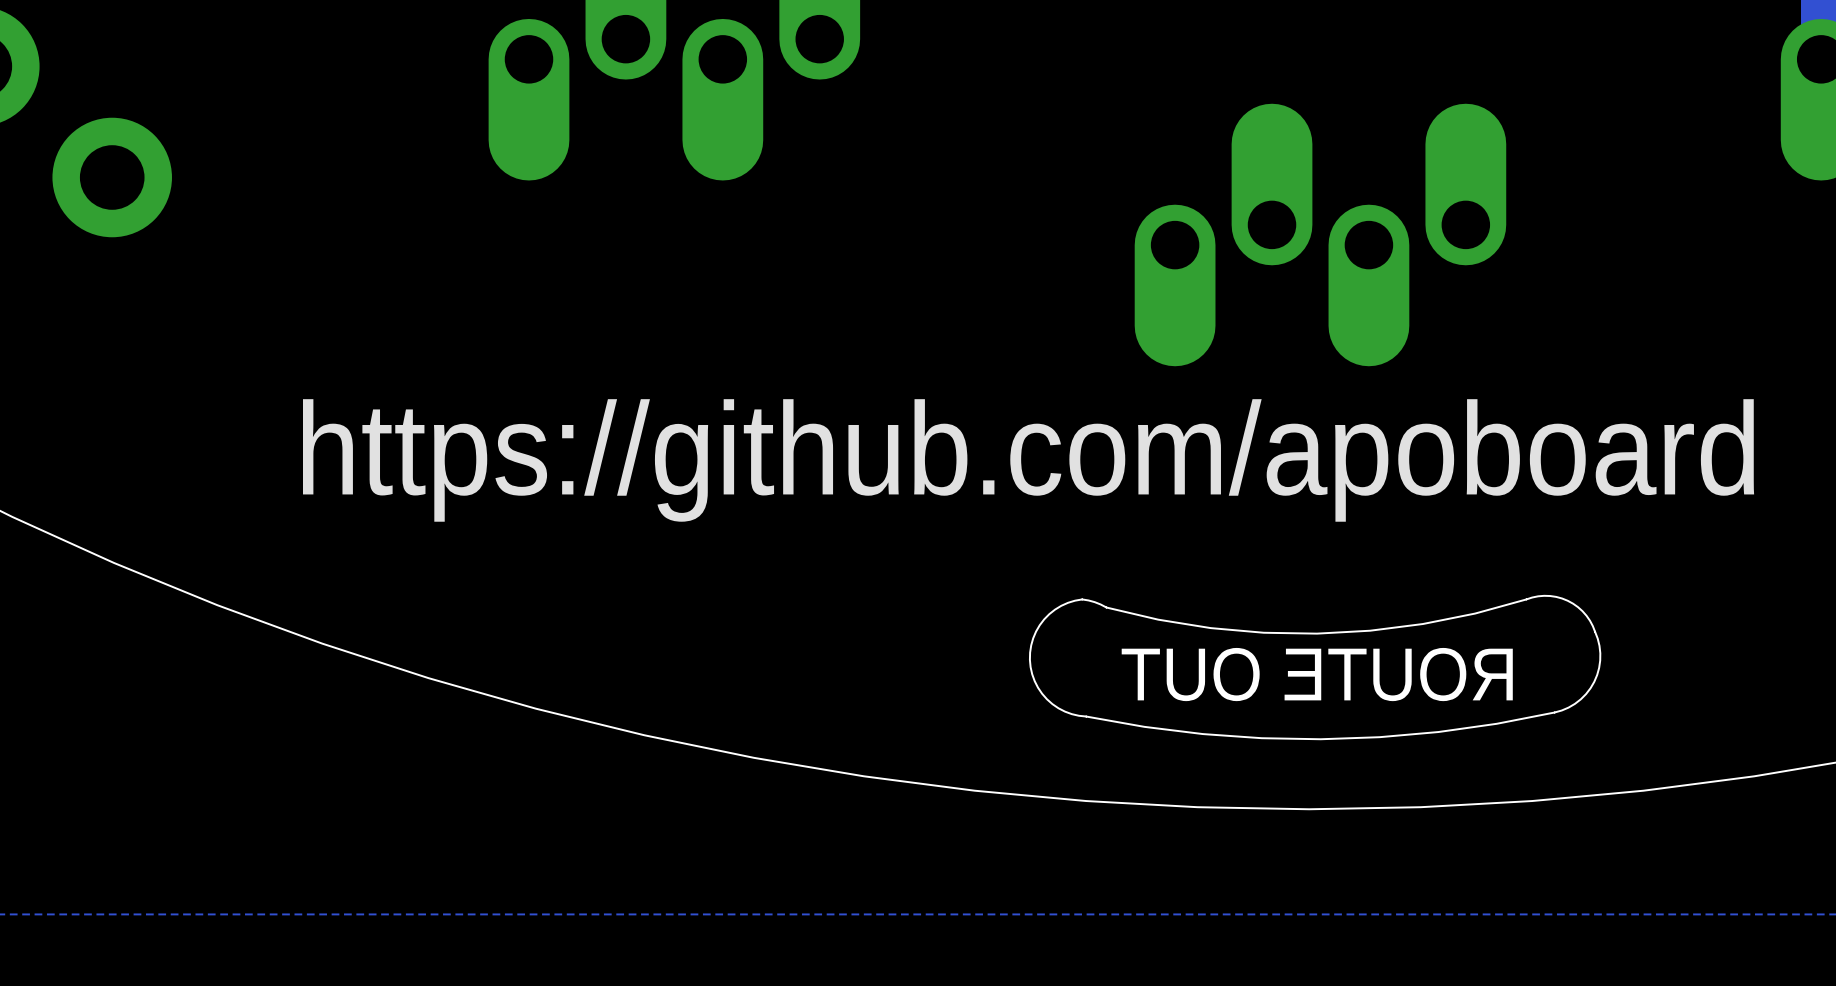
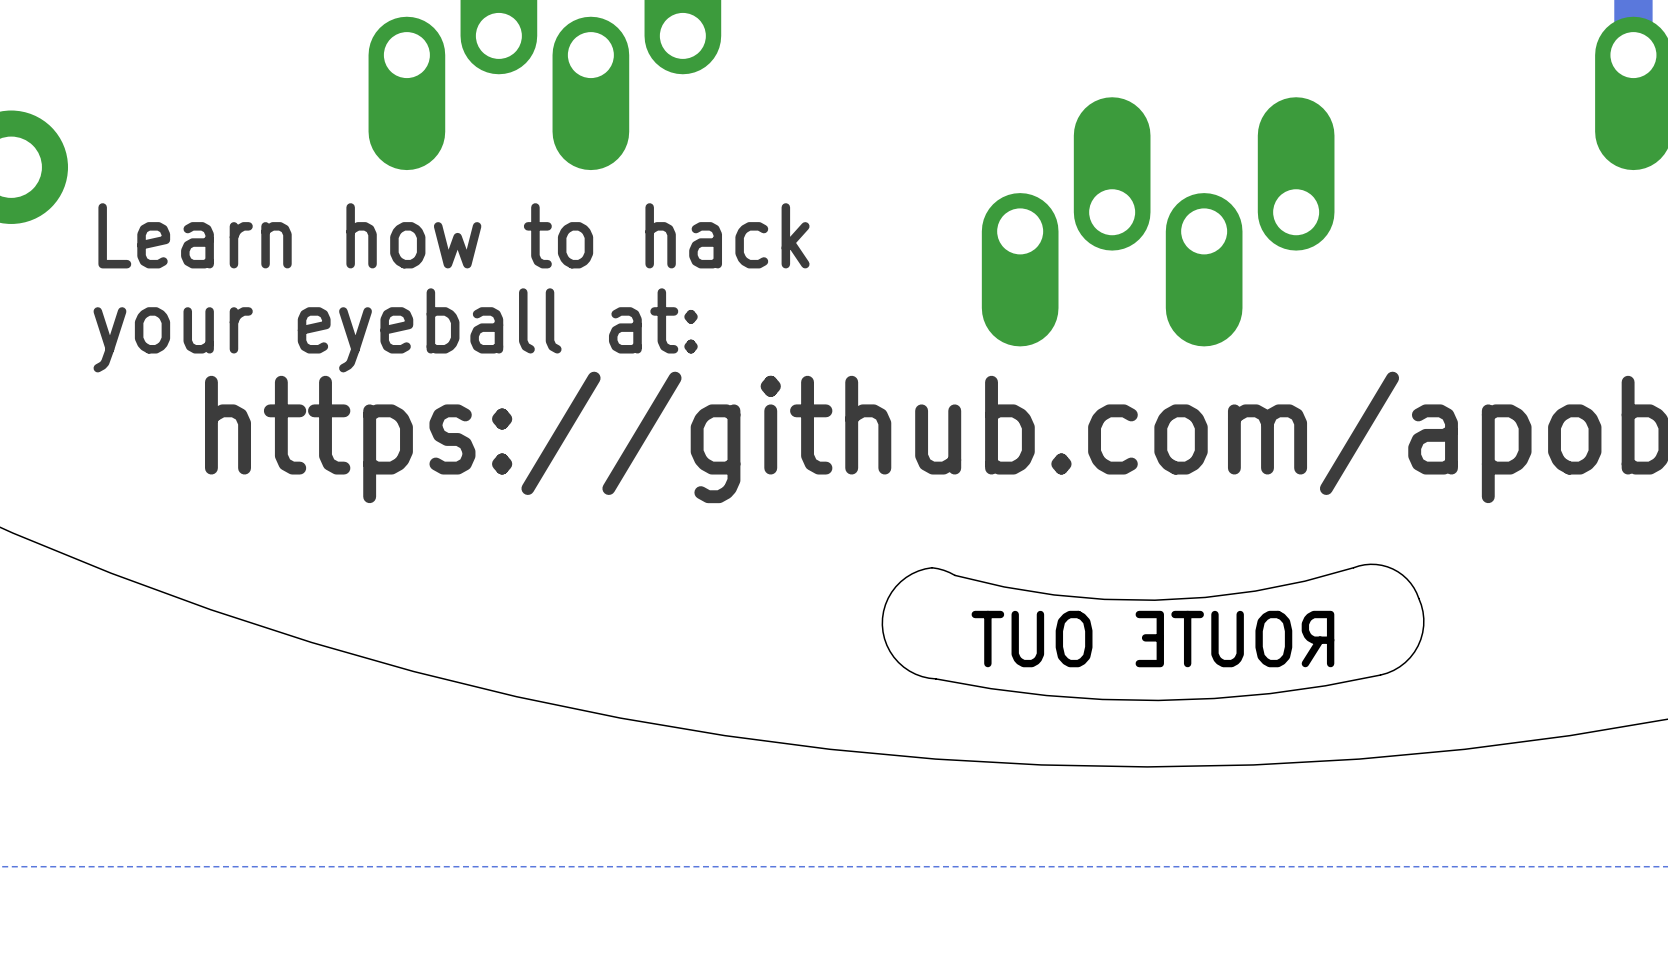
text: none -> Learn how to hack (453, 235)
text: none -> your eyeball at: (395, 330)

